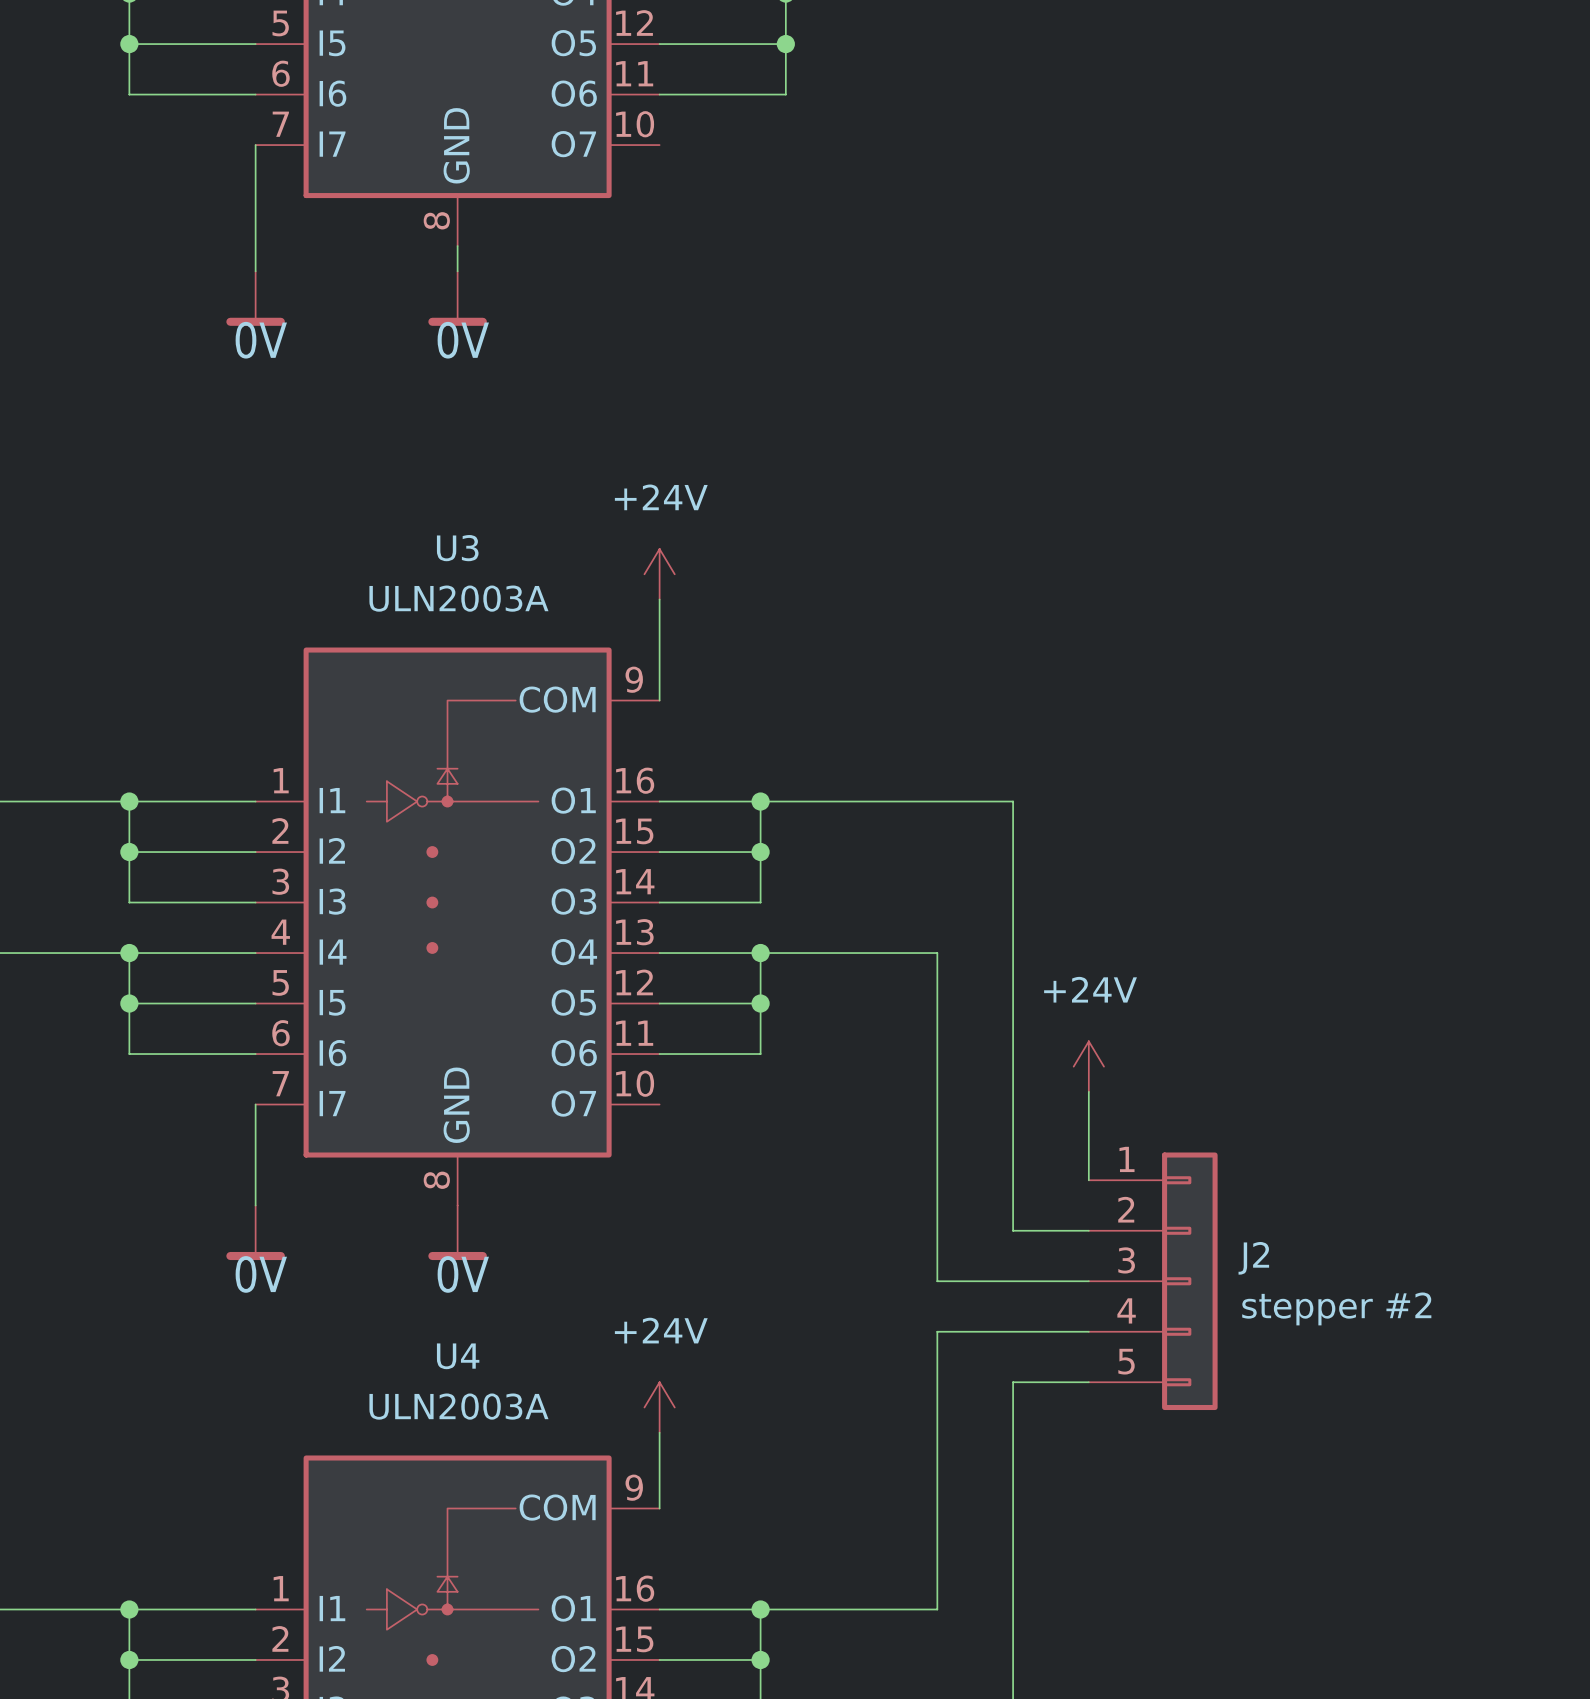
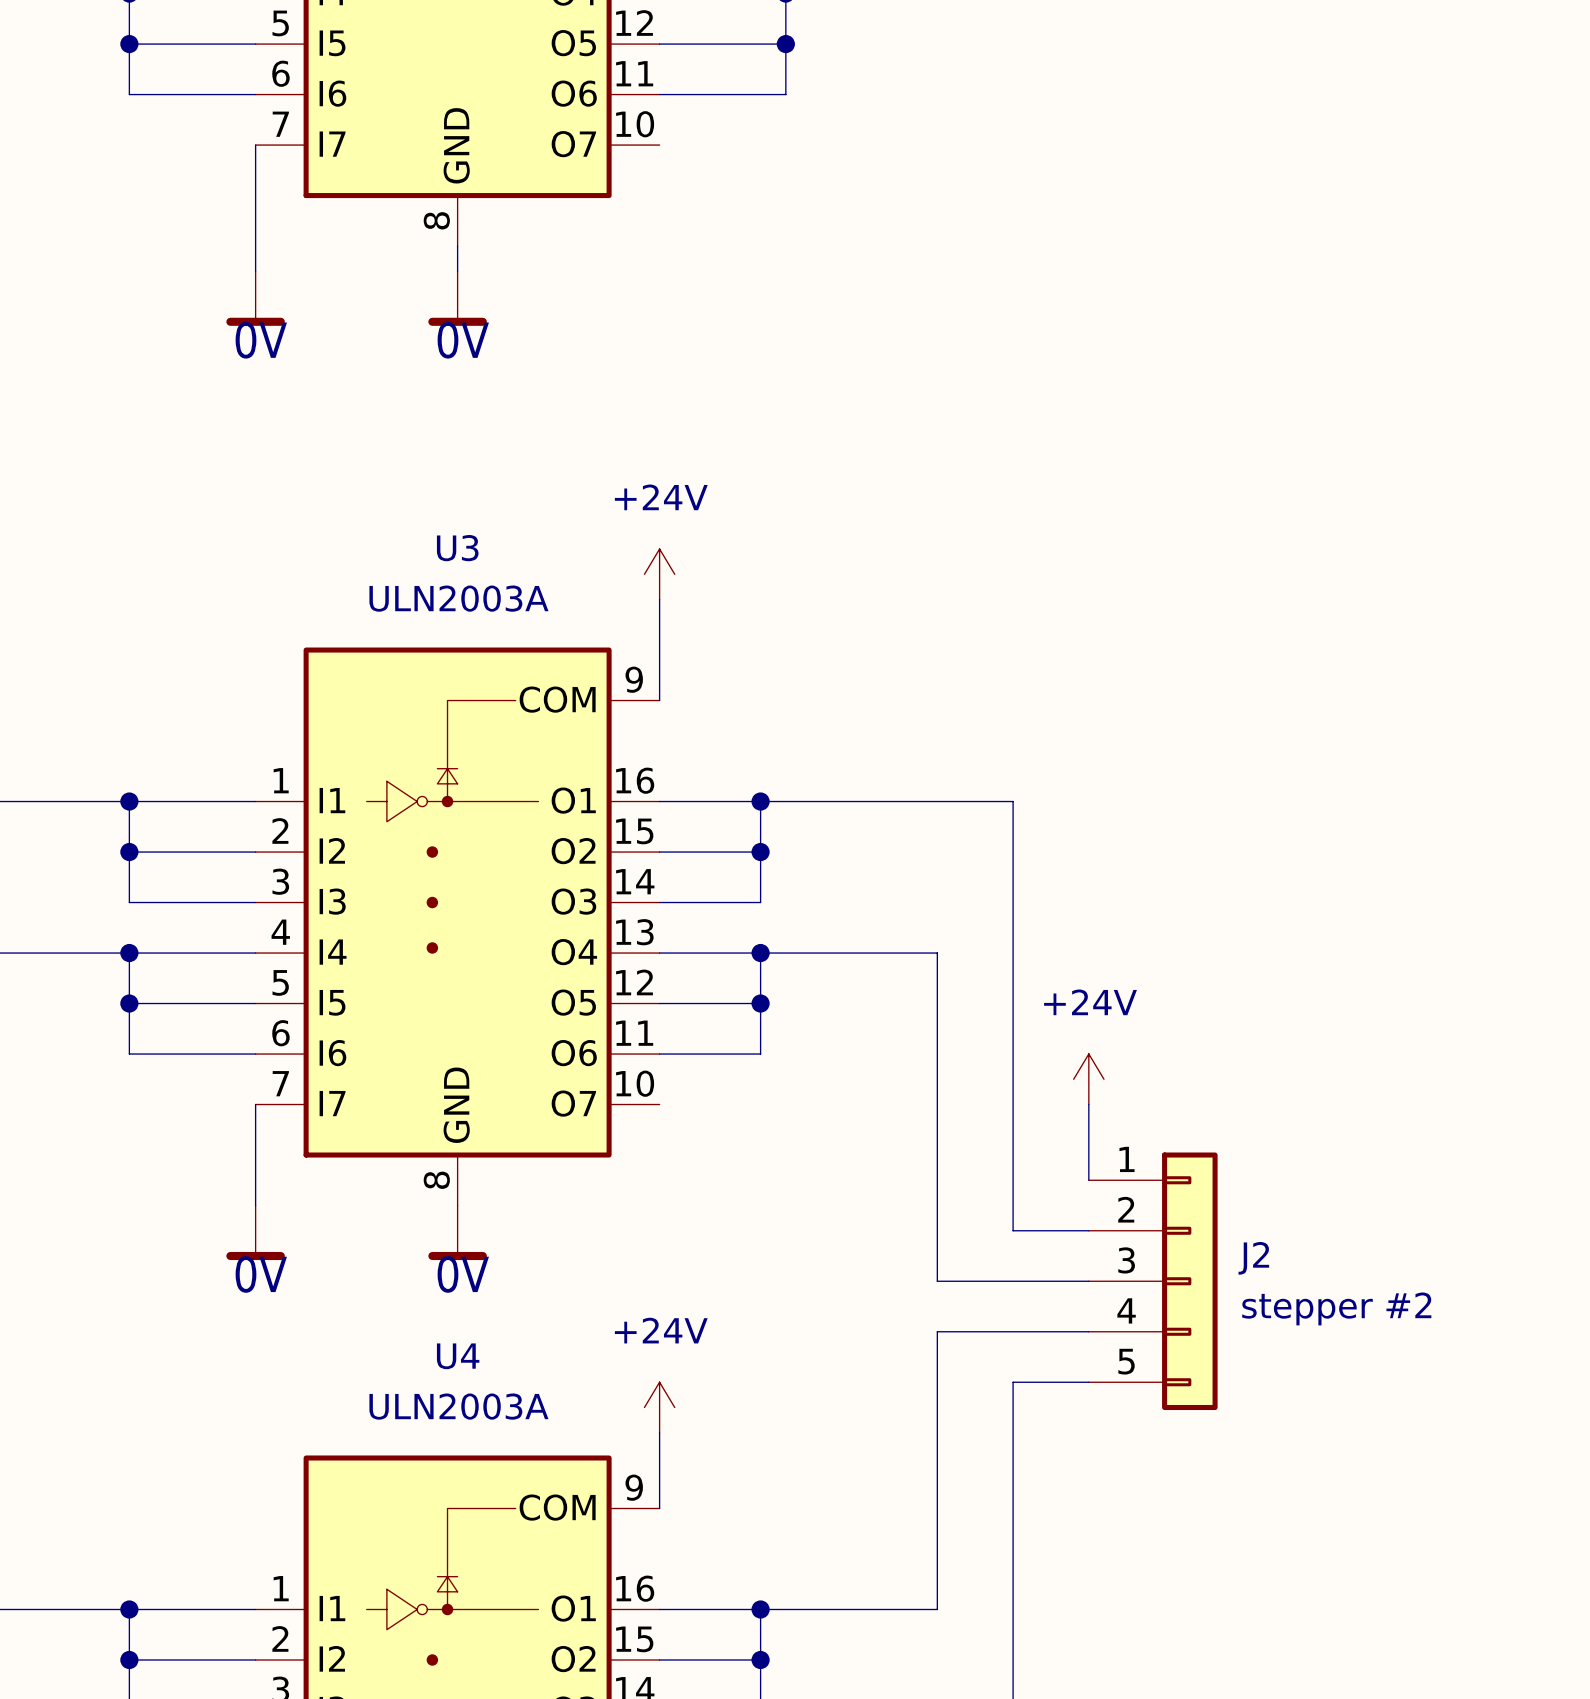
power symbol position: +24V (1088, 1066) -> +24V (1088, 1079)

